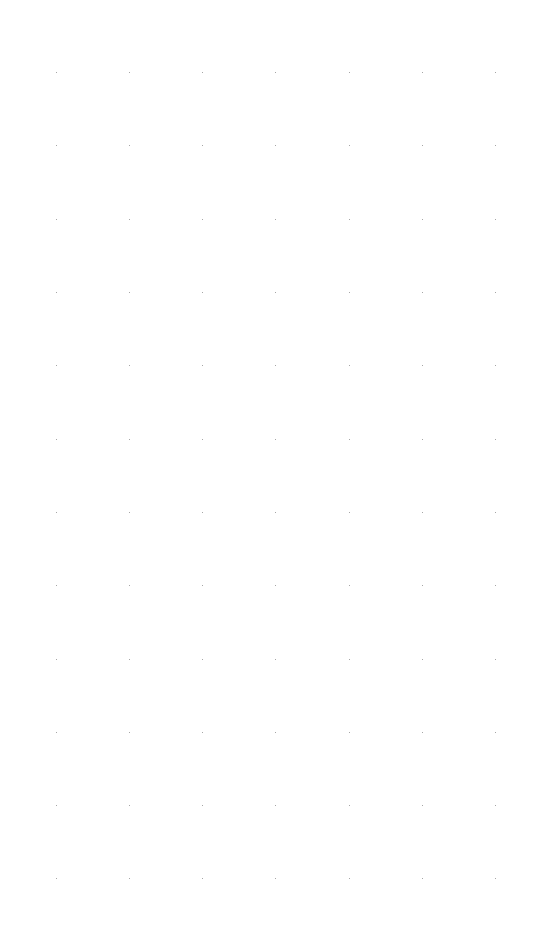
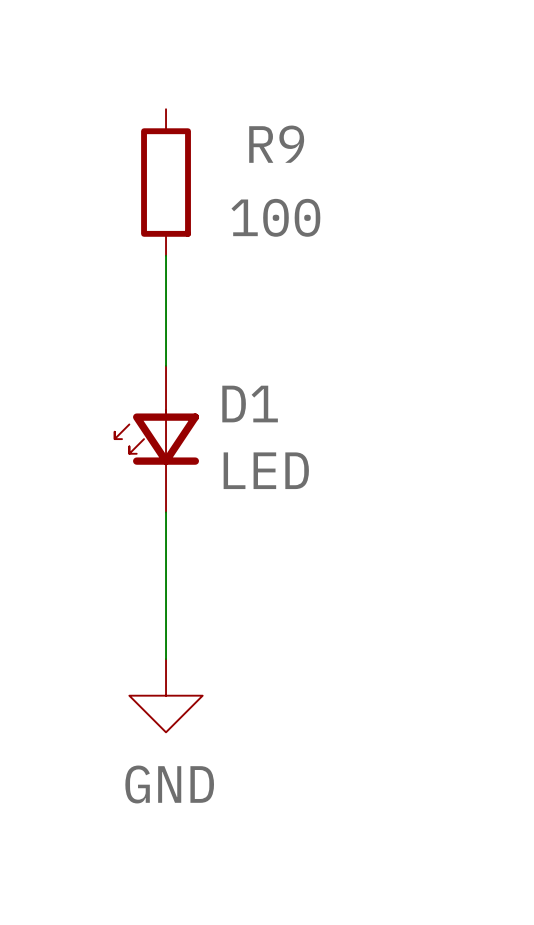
R9: none -> 100 (166, 182)
wire: none -> (166, 255) (166, 365)
D1: none -> LED (156, 439)
wire: none -> (166, 512) (166, 659)
power symbol: none -> GND (166, 695)

